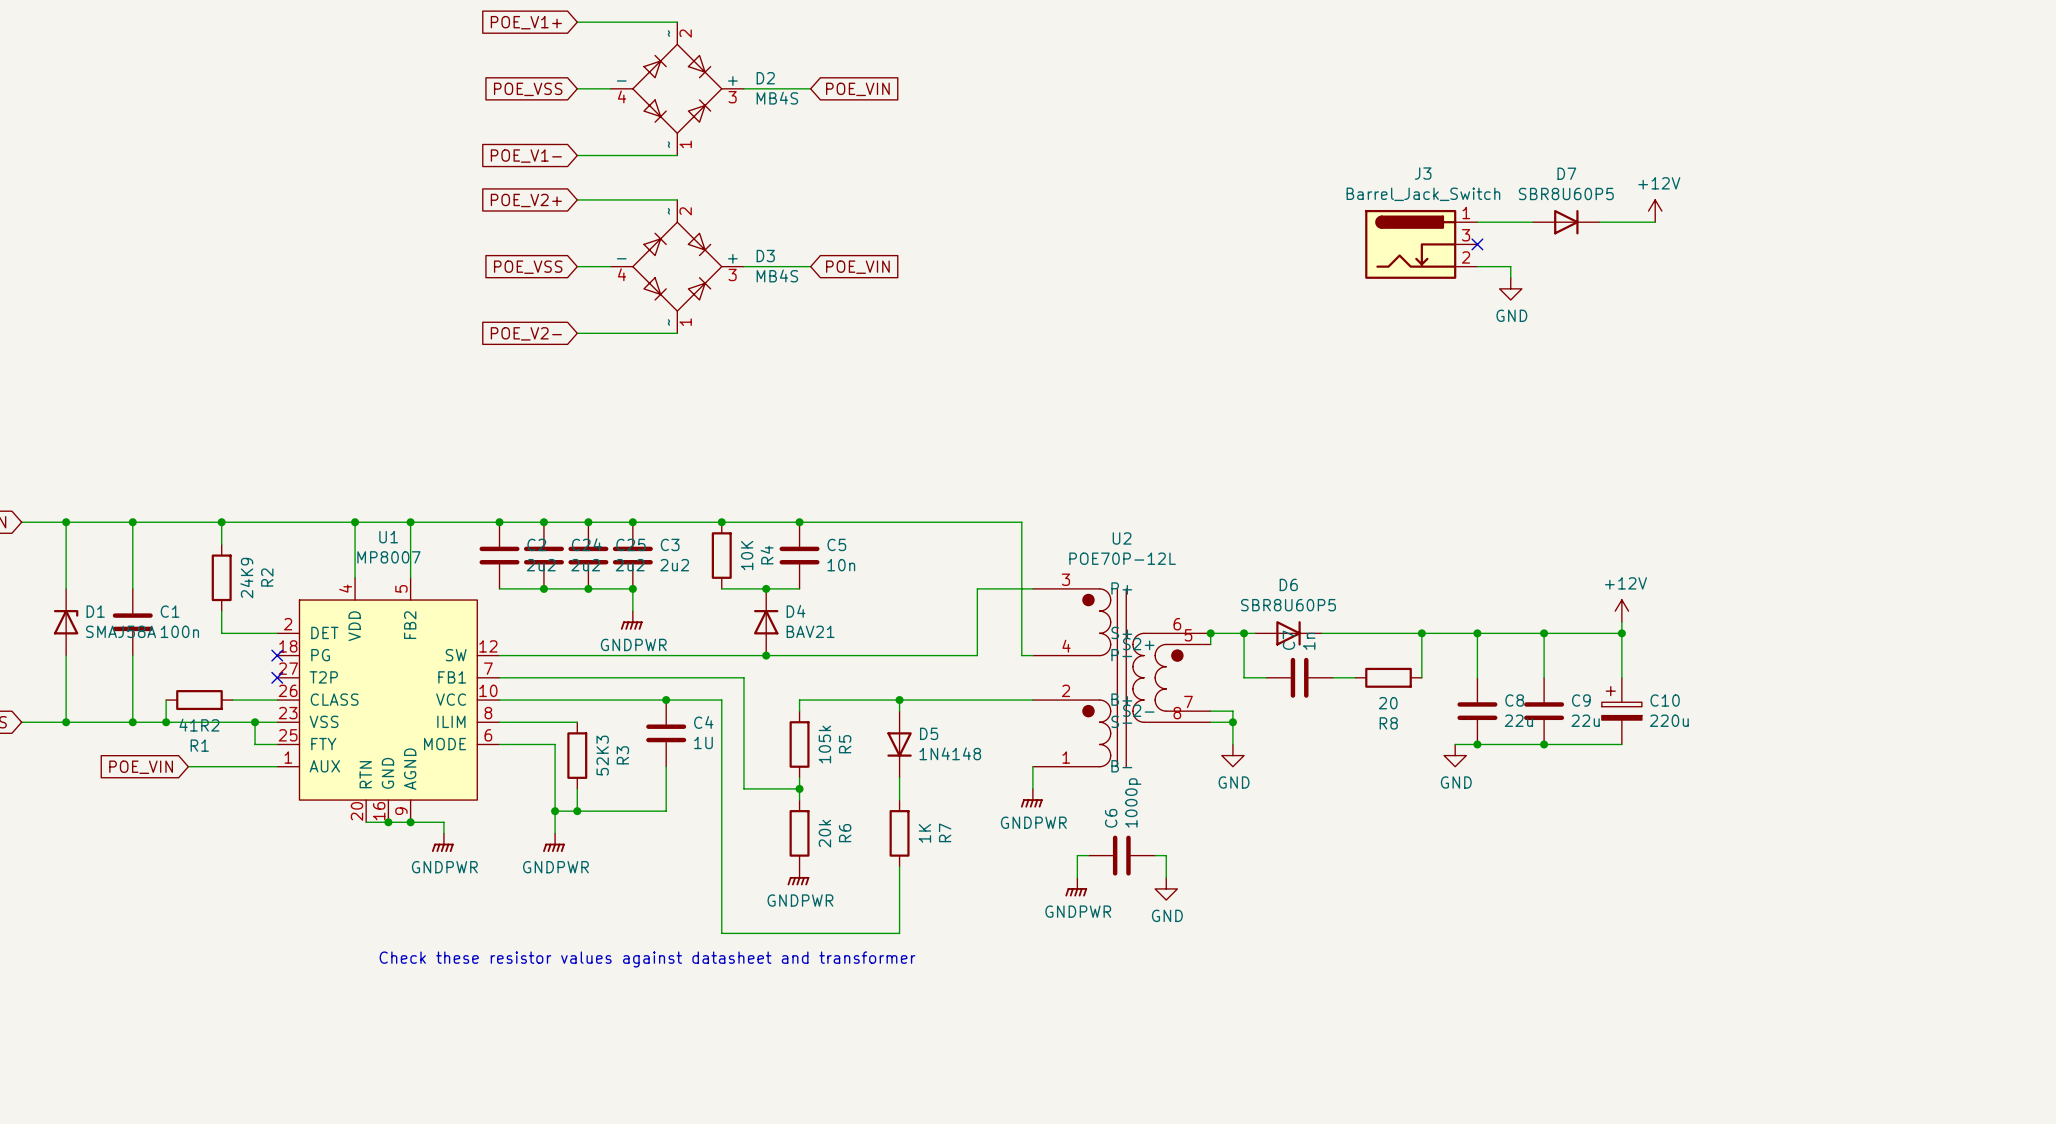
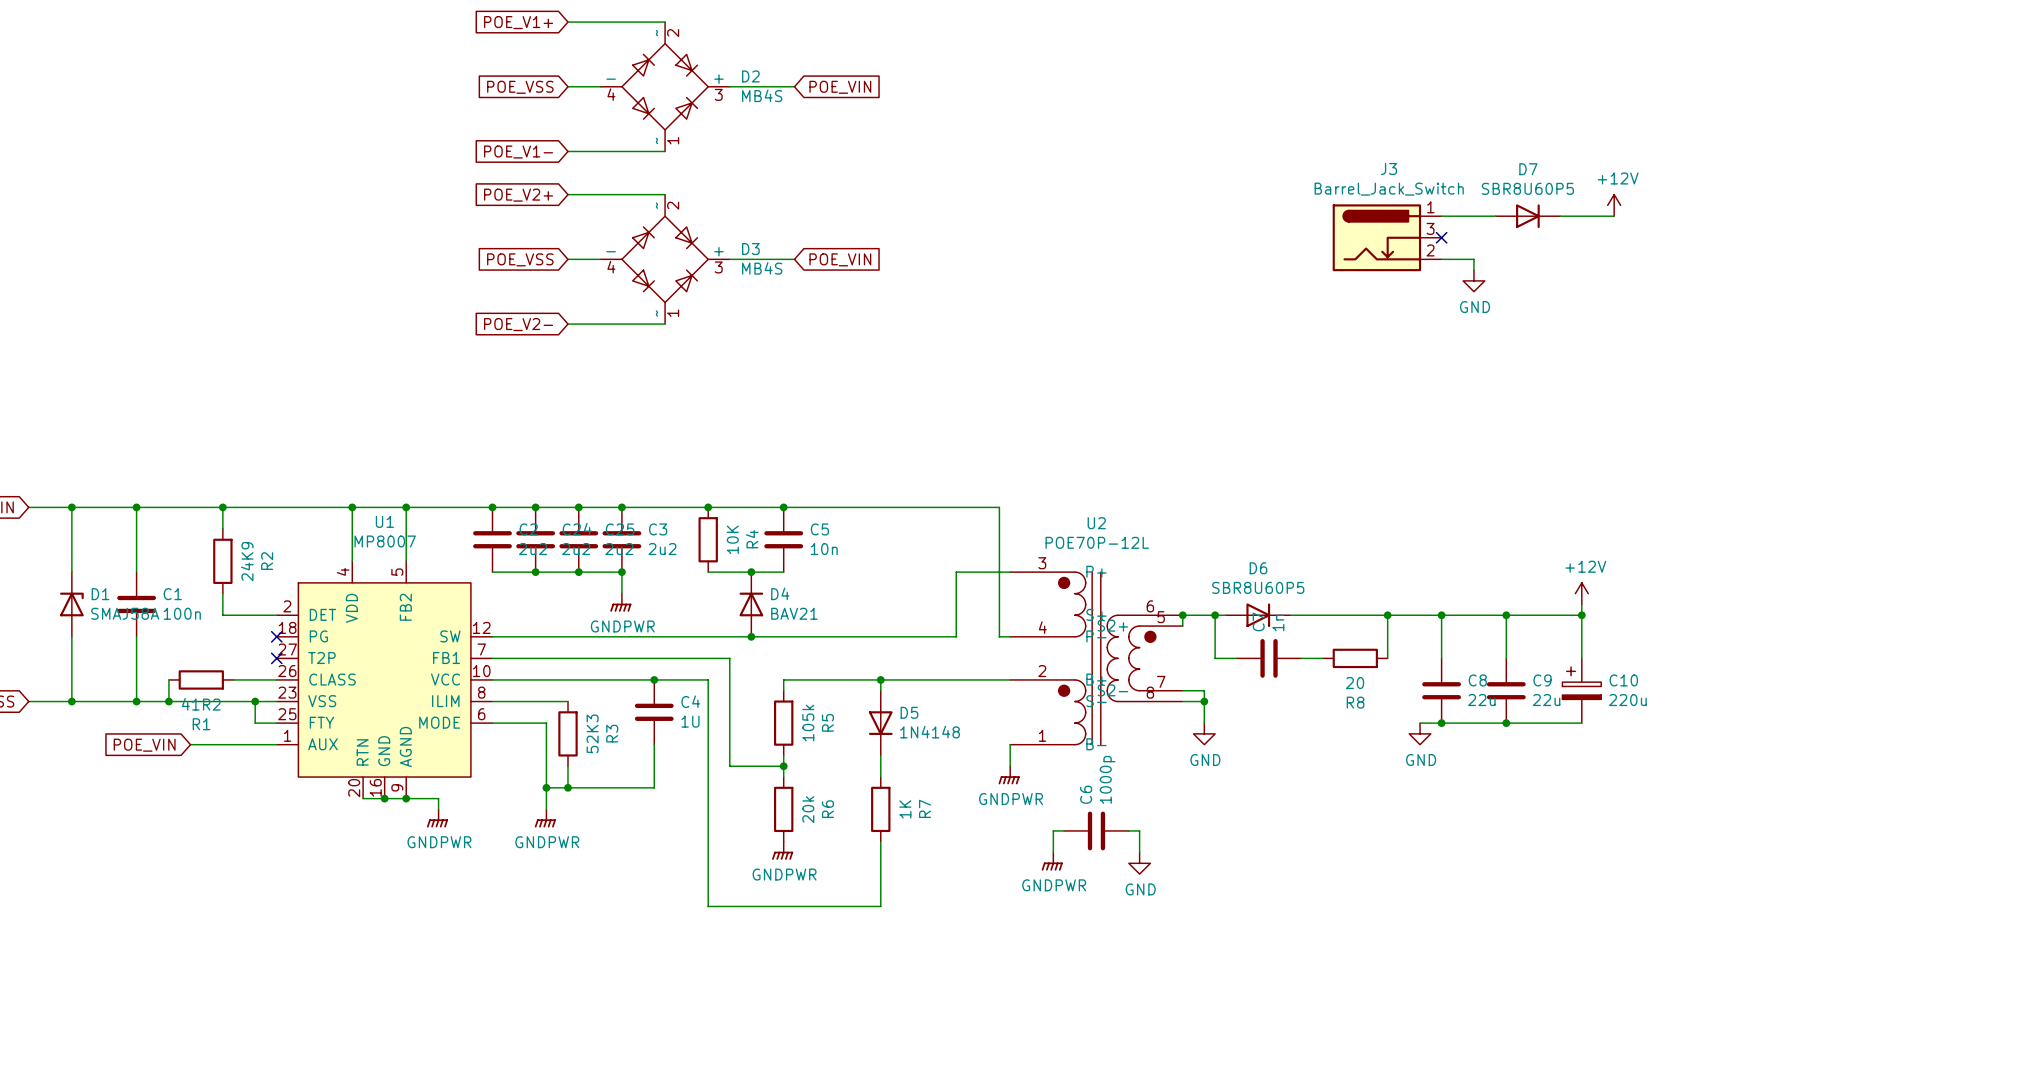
text: Check these resistor values against datasheet and transformer (647, 959) -> none

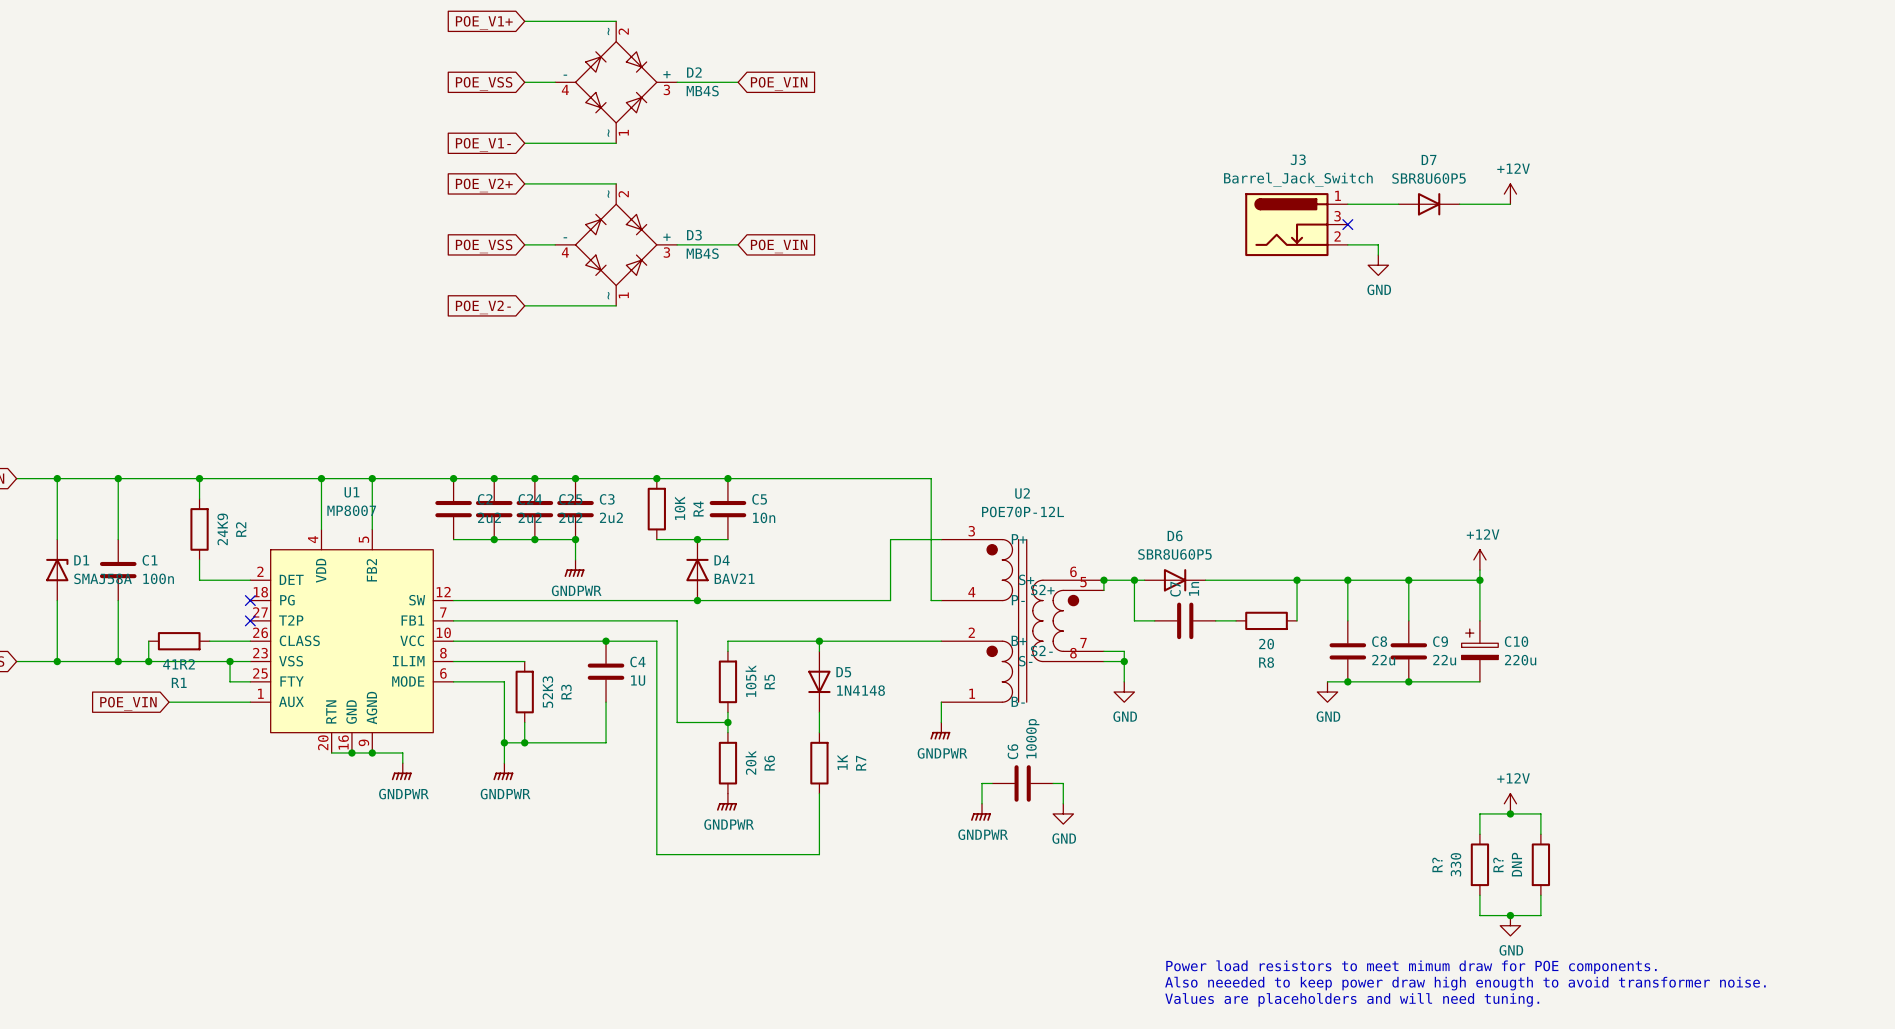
power symbol: none -> +12V (1510, 803)
junction: none -> (1510, 813)
wire: none -> (1479, 834) (1479, 813) (1540, 813) (1540, 834)
R?: none -> 330 (1479, 864)
R?: none -> DNP (1540, 864)
wire: none -> (1479, 895) (1479, 915) (1540, 915) (1540, 895)
junction: none -> (1510, 915)
power symbol: none -> GND (1510, 925)
text: none -> Power load resistors to meet mimum draw for POE components. (1411, 967)
text: none -> Also neeeded to keep power draw high enougth to avoid transformer noise. (1465, 983)
text: none -> Values are placeholders and will need tuning. (1352, 999)

